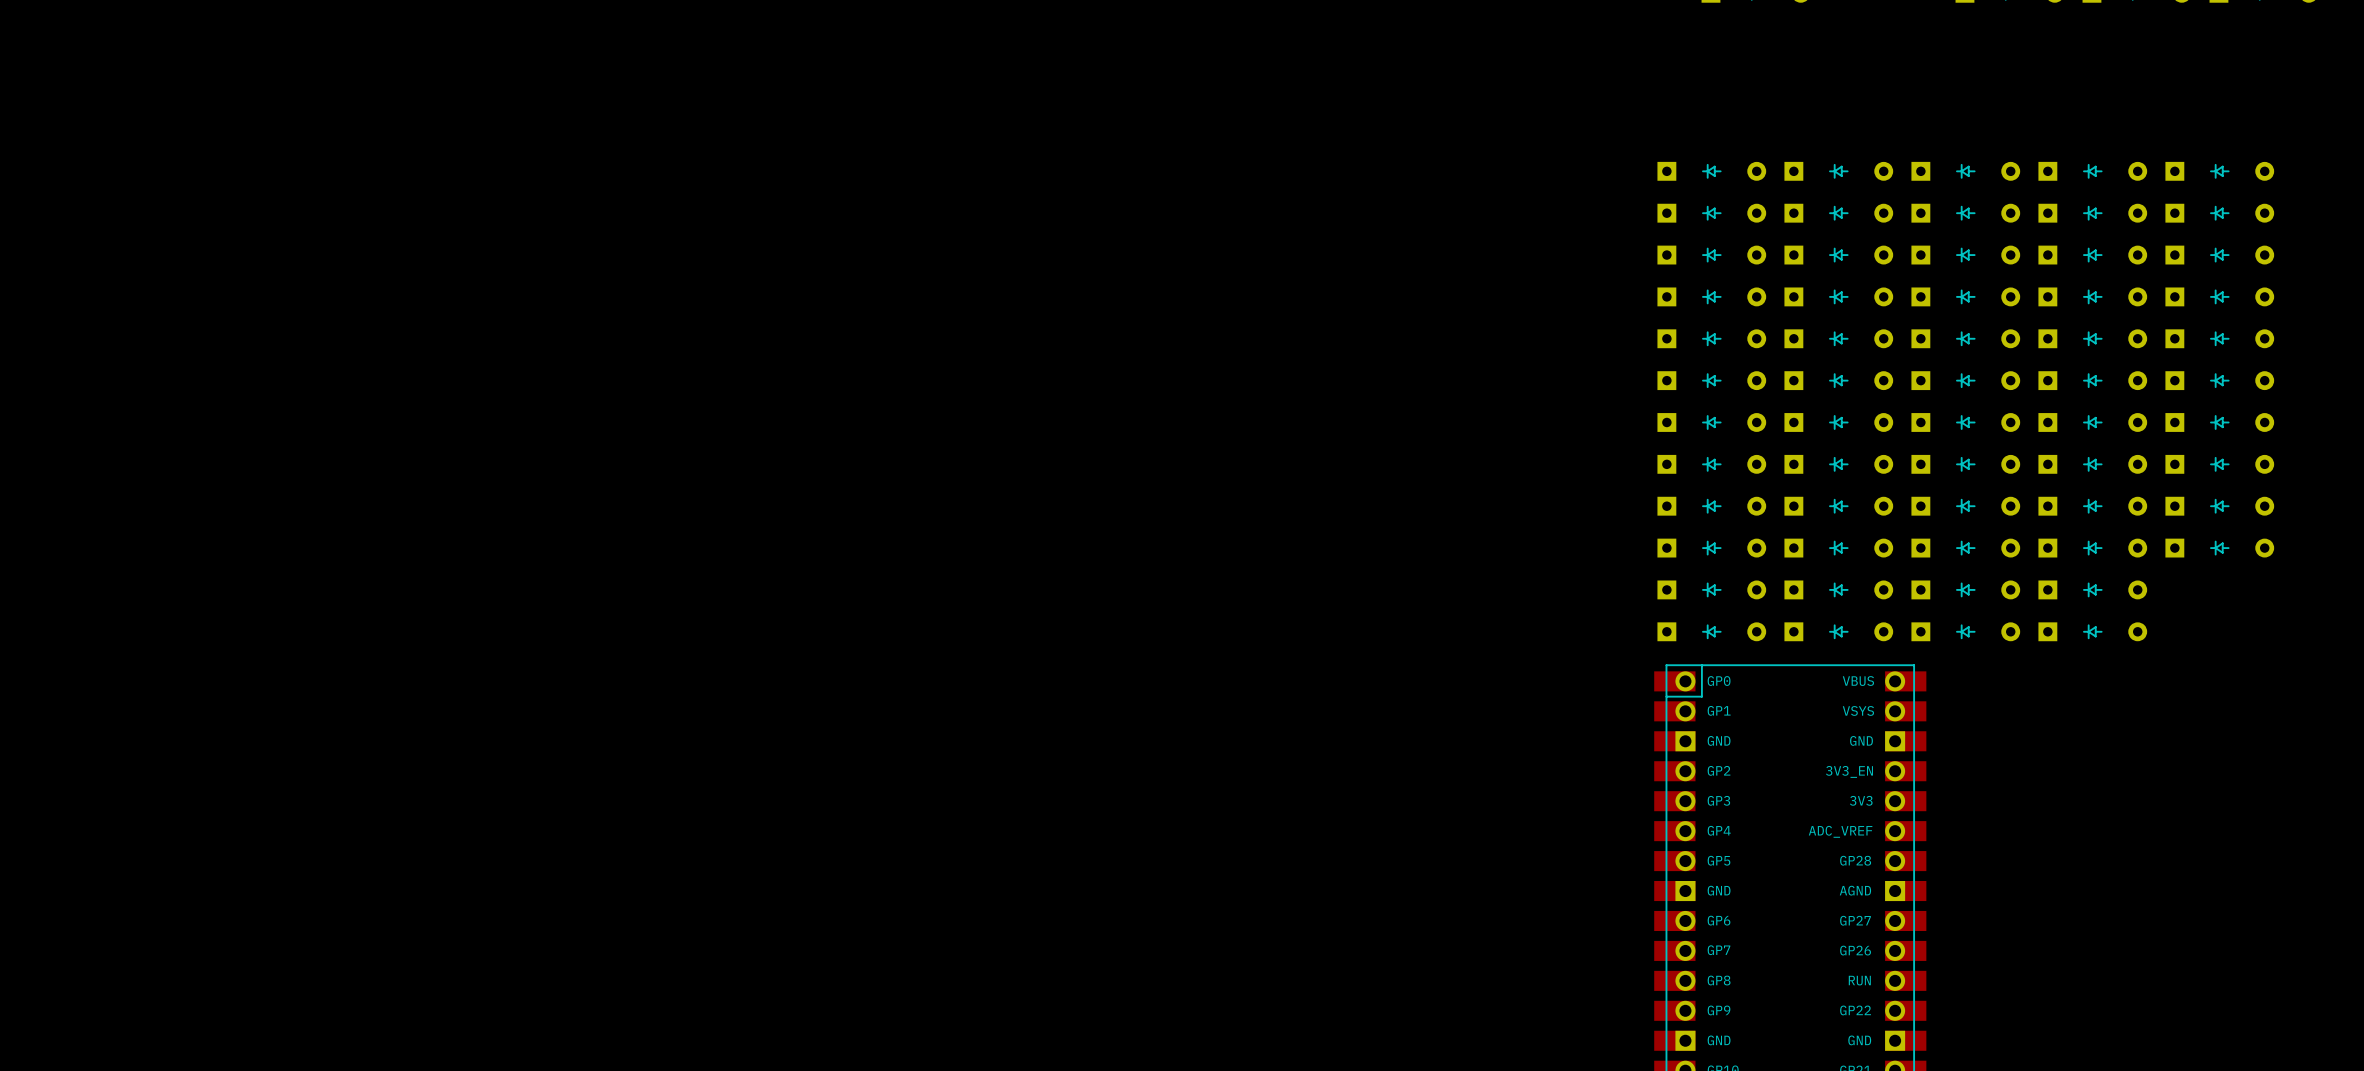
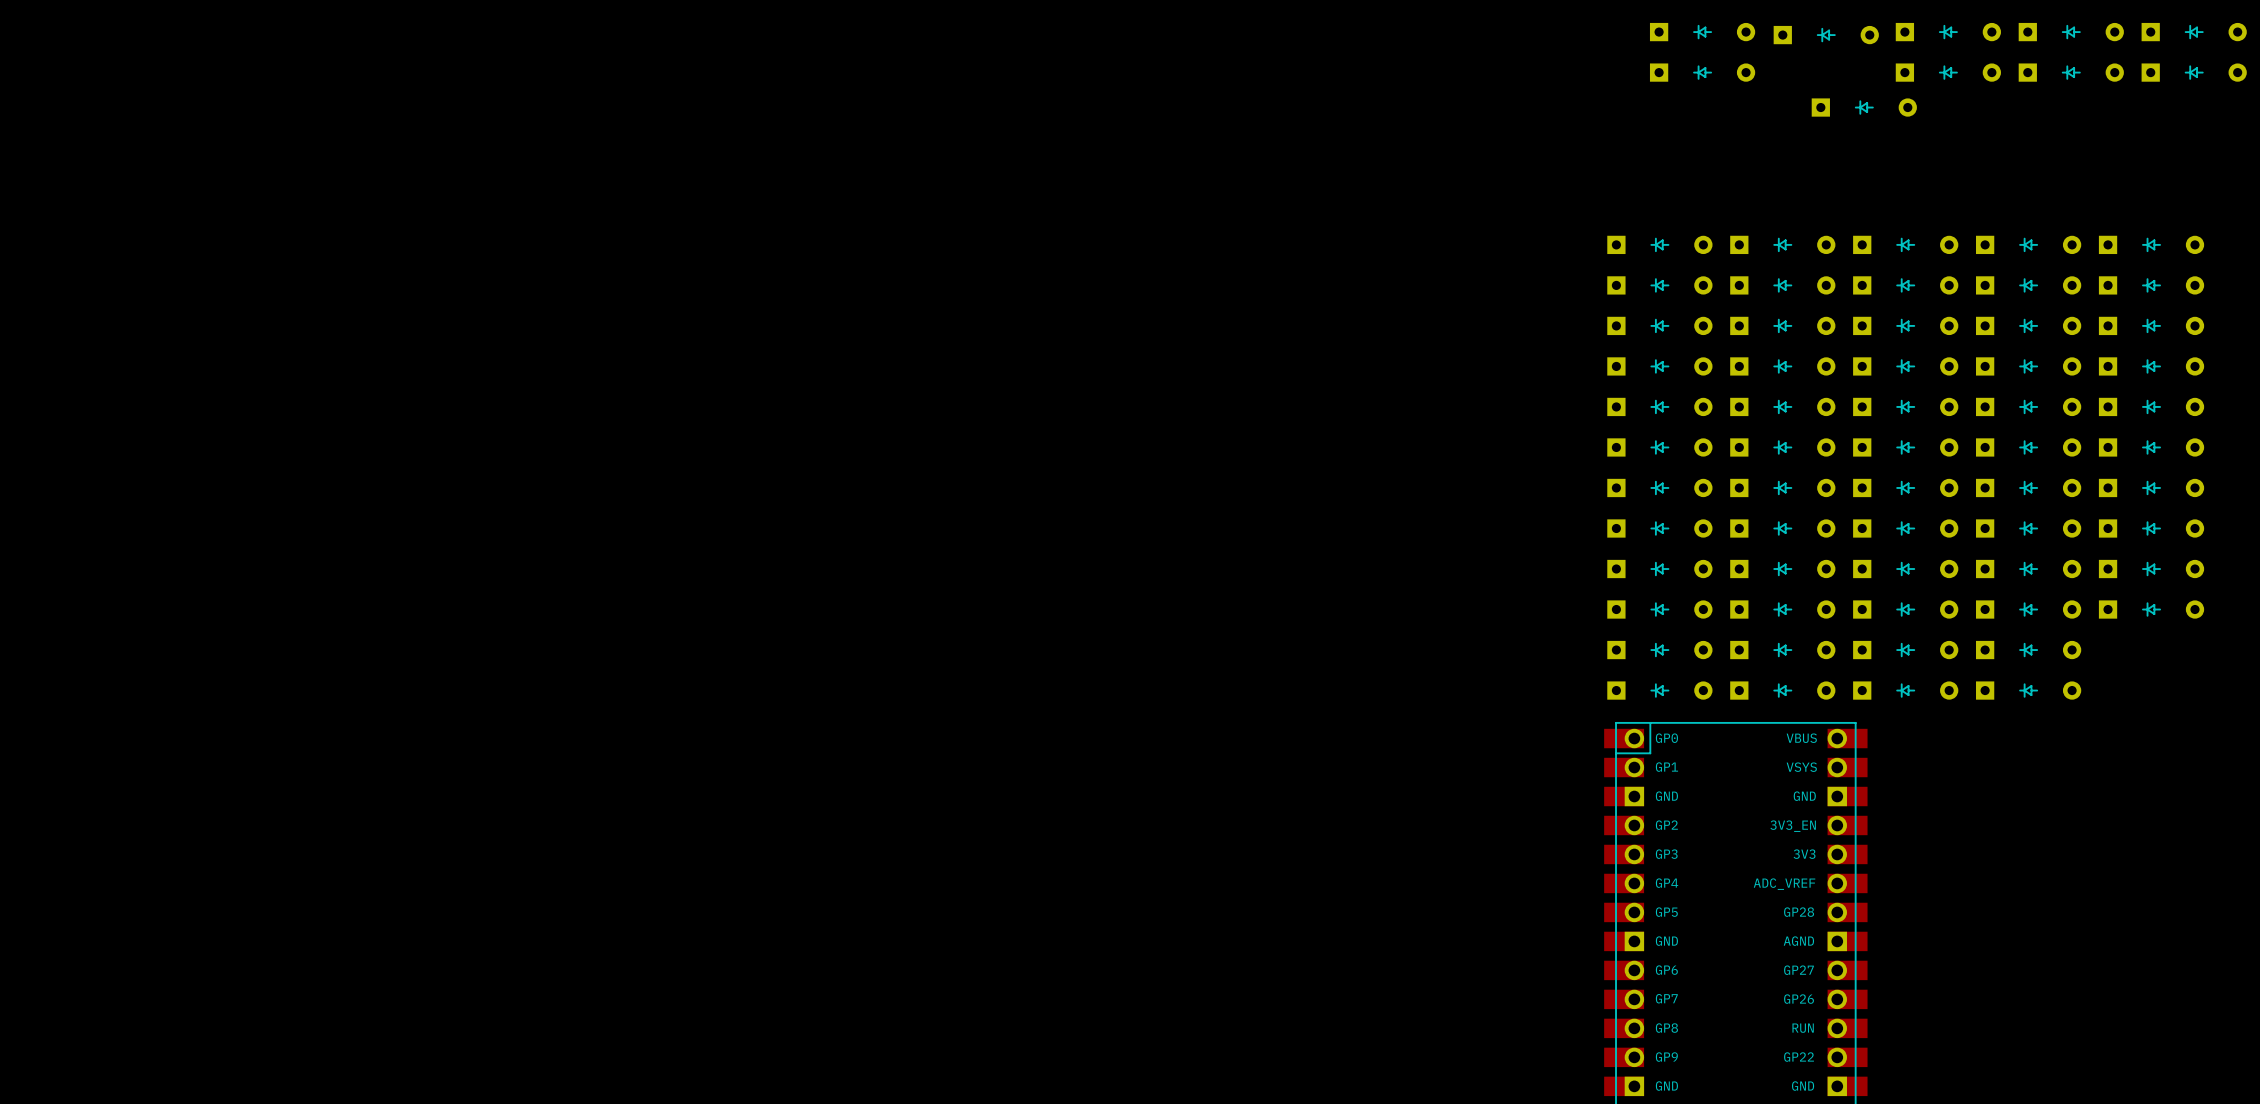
part: none -> (1864, 107)

